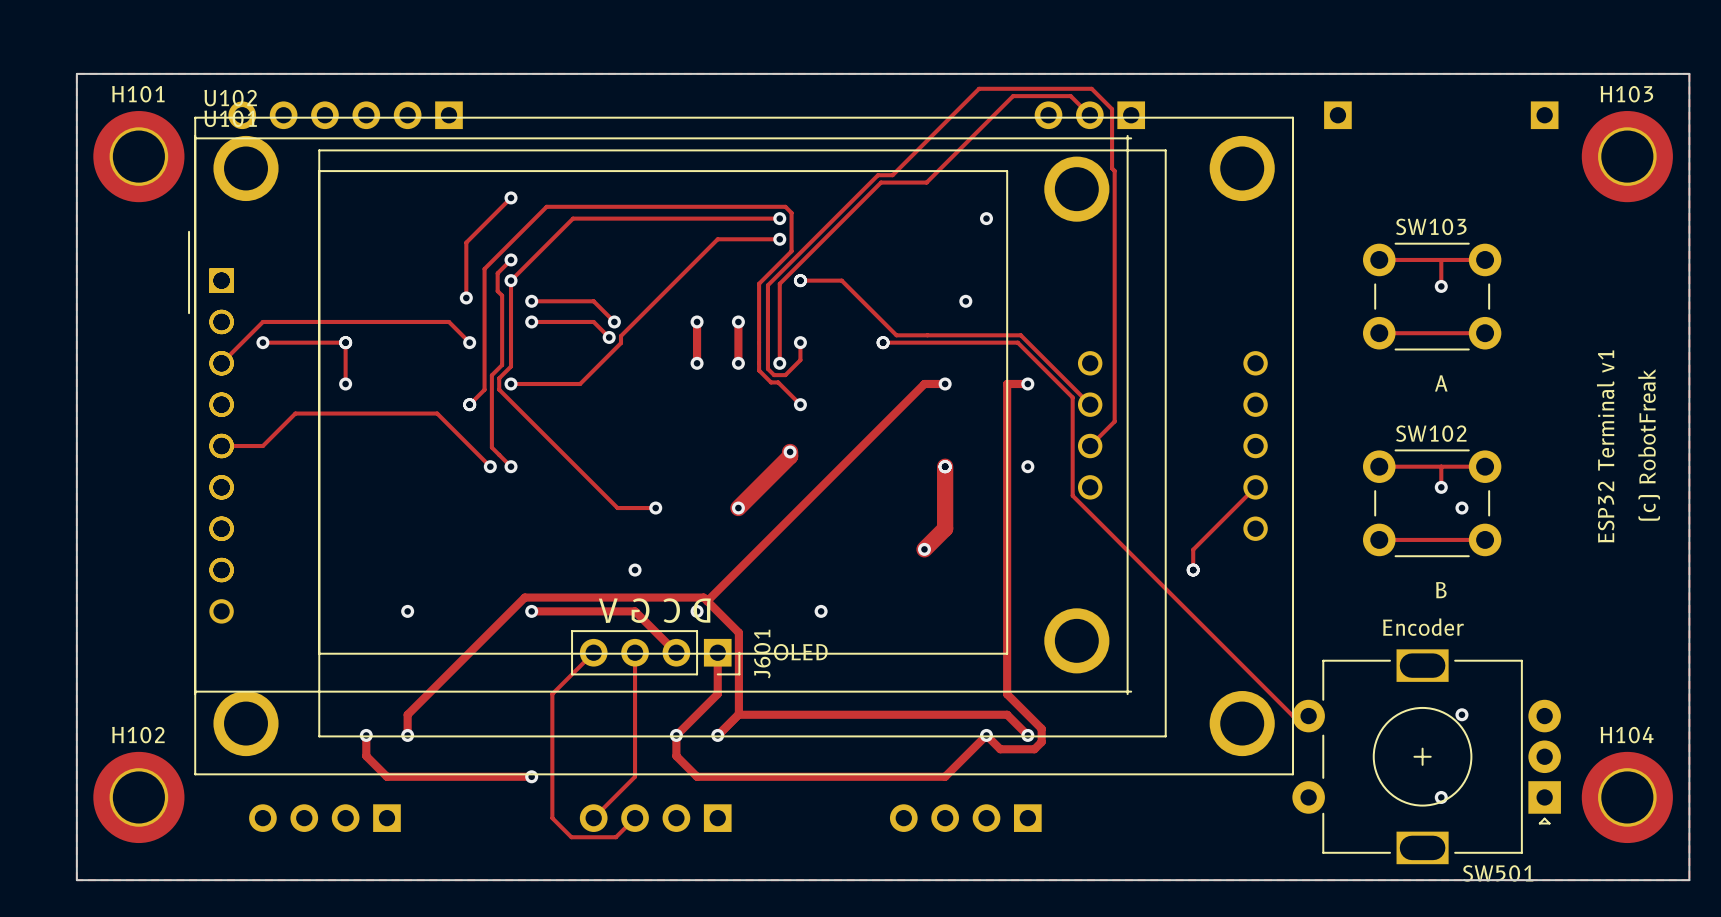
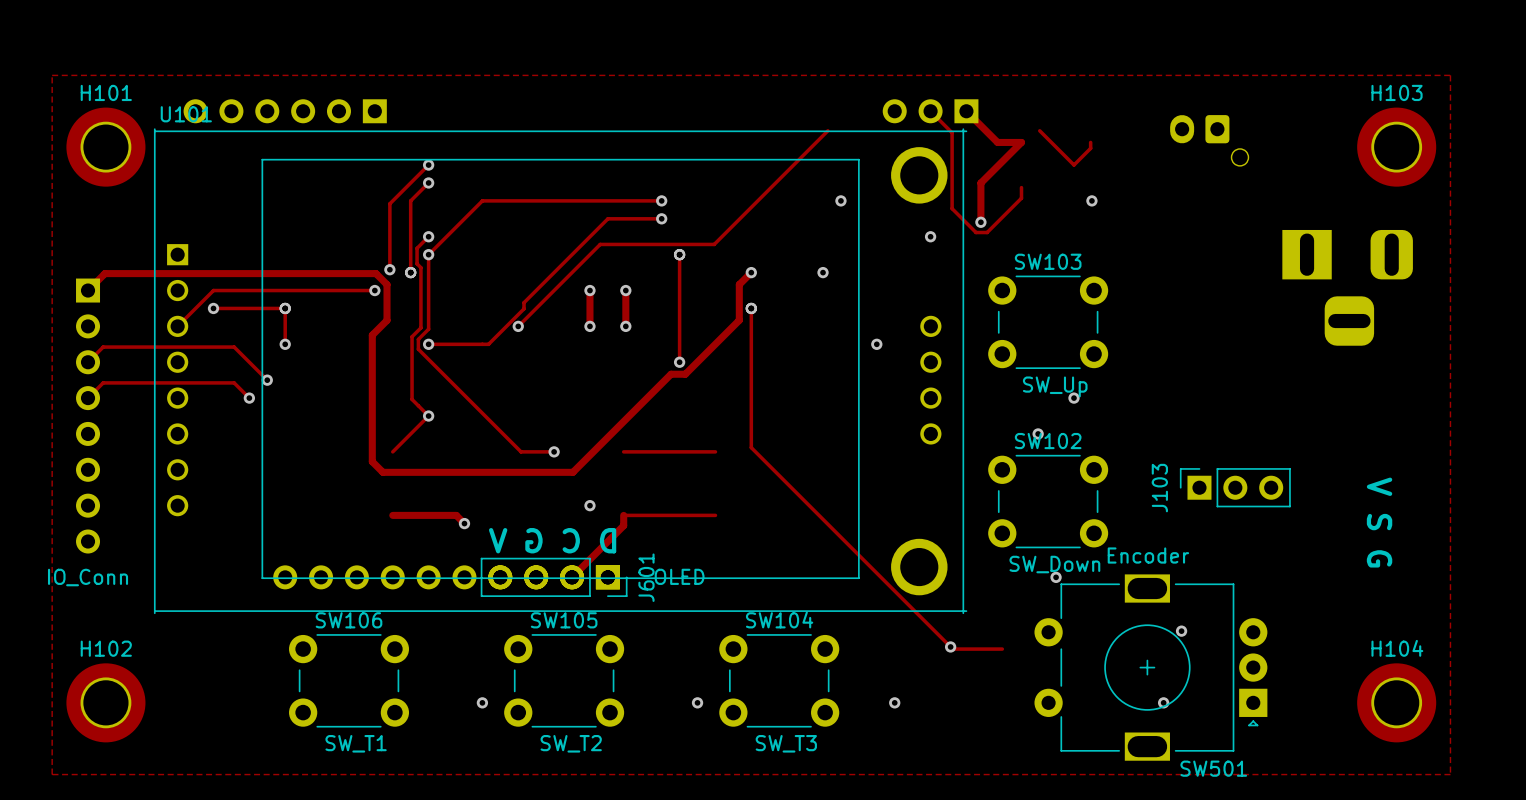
board edge: (76, 73) (1689, 73) (1689, 880) (76, 880) (76, 73) -> none
track: (1089, 115) (1070, 96) (1013, 96) (971, 137) -> (930, 111) (952, 132) (952, 159)
track: none -> (966, 111) (997, 142) (1021, 142) (980, 183) (980, 222)
part: (1337, 115) -> none
part: (1544, 115) -> none
track: none -> (1039, 130) (1073, 165) (1090, 148) (1090, 142)
part: none -> (1209, 140)
track: (1114, 170) (1112, 168) (1112, 109) (1091, 88) (979, 88) (892, 175) (878, 175) (767, 285) (767, 368) (774, 375) (785, 375) (800, 360) -> none
via: none -> (428, 165)
track: (926, 182) (881, 182) (779, 283) (779, 363) -> (789, 169) (714, 244) (600, 244) (518, 326)
track: (490, 218) (466, 242) -> (428, 165) (389, 203) (389, 221)
track: none -> (410, 200) (410, 272)
via: none -> (1091, 200)
track: (1114, 227) (1114, 421) (1090, 446) -> (952, 208) (975, 232) (987, 232) (1021, 198) (1021, 187)
via: none -> (980, 222)
via: none -> (930, 236)
track: (1379, 259) (1485, 259) -> none
track: (1441, 259) (1441, 286) -> none
track: (800, 280) (841, 280) (896, 335) (1020, 335) (1090, 404) -> (679, 254) (679, 308)
via: (1441, 286) -> none
SW103 position: (1432, 296) -> (1048, 322)
via: none -> (410, 272)
track: (531, 301) (593, 301) (614, 321) -> none
via: (531, 301) -> none
track: none -> (751, 272) (739, 284) (739, 320) (685, 374) (671, 374) (572, 472) (382, 472) (372, 461) (372, 335) (387, 320) (387, 284) (376, 273) (104, 273) (88, 290)
via: none -> (751, 272)
part: none -> (1347, 287)
track: (448, 321) (469, 342) -> none
via: none -> (374, 290)
track: (531, 321) (593, 321) (609, 337) -> none
via: (531, 321) -> none
via: (614, 321) -> none
track: (1379, 333) (1485, 333) -> none
via: (609, 337) -> none
via: (469, 342) -> none
via: (800, 342) -> none
track: (883, 342) (1017, 342) (1072, 397) (1072, 495) (1292, 716) (1308, 716) -> (751, 308) (751, 447) (952, 649) (1002, 649)
via: none -> (518, 326)
via: (779, 363) -> none
track: (945, 383) (924, 383) (707, 601) -> none
via: (945, 383) -> none
track: (1027, 383) (1007, 383) (1007, 694) (1041, 728) (1041, 742) (1034, 749) (1000, 749) (986, 735) (945, 776) (697, 776) (676, 756) (676, 735) (717, 694) (717, 652) -> none
text: A (1441, 383) -> none
track: none -> (88, 362) (103, 347) (234, 347) (267, 380)
track: (469, 404) (484, 389) (484, 268) (546, 206) (785, 206) (791, 212) (791, 251) (759, 283) (759, 370) (771, 382) (778, 382) (800, 404) -> (679, 323) (679, 362)
via: (469, 404) -> none
via: none -> (267, 380)
SW103 value: none -> SW_Up (1055, 386)
text: (c) RobotFreak (1649, 444) -> none
track: none -> (88, 398) (103, 382) (234, 382) (249, 398)
track: (221, 446) (262, 446) (295, 413) (437, 413) (490, 466) -> none
via: none -> (249, 398)
U102: (741, 446) -> none
via: none -> (1073, 398)
text: ESP32 Terminal v1 (1605, 446) -> none
track: (790, 451) (790, 456) (738, 508) -> none
via: (790, 451) -> none
part: none -> IO_Conn (88, 416)
via: (490, 466) -> none
track: none -> (428, 416) (392, 451)
track: (945, 466) (945, 528) (924, 549) -> none
via: (945, 466) -> none
via: (1027, 466) -> none
track: (1379, 466) (1485, 466) -> none
track: (1441, 466) (1441, 487) -> none
via: none -> (1038, 433)
track: (1255, 487) (1193, 549) (1193, 570) -> none
via: (1441, 487) -> none
SW102 position: (1432, 503) -> (1048, 501)
track: none -> (623, 451) (715, 451)
via: (738, 508) -> none
via: (1461, 508) -> none
track: (1379, 539) (1485, 539) -> none
via: (924, 549) -> none
J103: none -> (1235, 487)
via: (635, 570) -> none
via: none -> (589, 505)
via: (1193, 570) -> none
track: none -> (392, 515) (456, 515) (464, 523)
text: B (1441, 590) -> none
text: none -> V S G (1379, 522)
via: (407, 611) -> none
track: (531, 611) (635, 611) (676, 652) -> (715, 515) (623, 515) (623, 525) (572, 577)
via position: (531, 611) -> (464, 523)
via: (697, 611) -> none
via: (821, 611) -> none
SW102 value: none -> SW_Down (1054, 564)
part: none -> (446, 577)
track: (593, 652) (552, 694) (552, 818) (571, 837) (615, 837) (635, 818) -> none
track: (635, 652) (635, 776) (593, 818) -> none
via: none -> (1056, 577)
track: (738, 714) (1007, 714) (1027, 735) -> none
via: none -> (1181, 631)
via: (1461, 714) -> none
via: none -> (950, 646)
track: (366, 735) (366, 756) (386, 776) (531, 776) -> none
via: (366, 735) -> none
track: (407, 735) (407, 714) (524, 597) (703, 597) (738, 632) (738, 714) (717, 735) -> none
via: (407, 735) -> none
via: (676, 735) -> none
via: (717, 735) -> none
via: (986, 735) -> none
via: (1027, 735) -> none
SW501 position: (1426, 756) -> (1150, 667)
SW106: none -> SW_T1 (349, 680)
SW105: none -> SW_T2 (564, 680)
SW104: none -> SW_T3 (779, 680)
via position: (531, 776) -> (482, 702)
via: none -> (697, 702)
via: none -> (894, 702)
via: none -> (1163, 702)
via: (1441, 797) -> none
part: (324, 818) -> none
part: (655, 818) -> none
part: (965, 818) -> none

